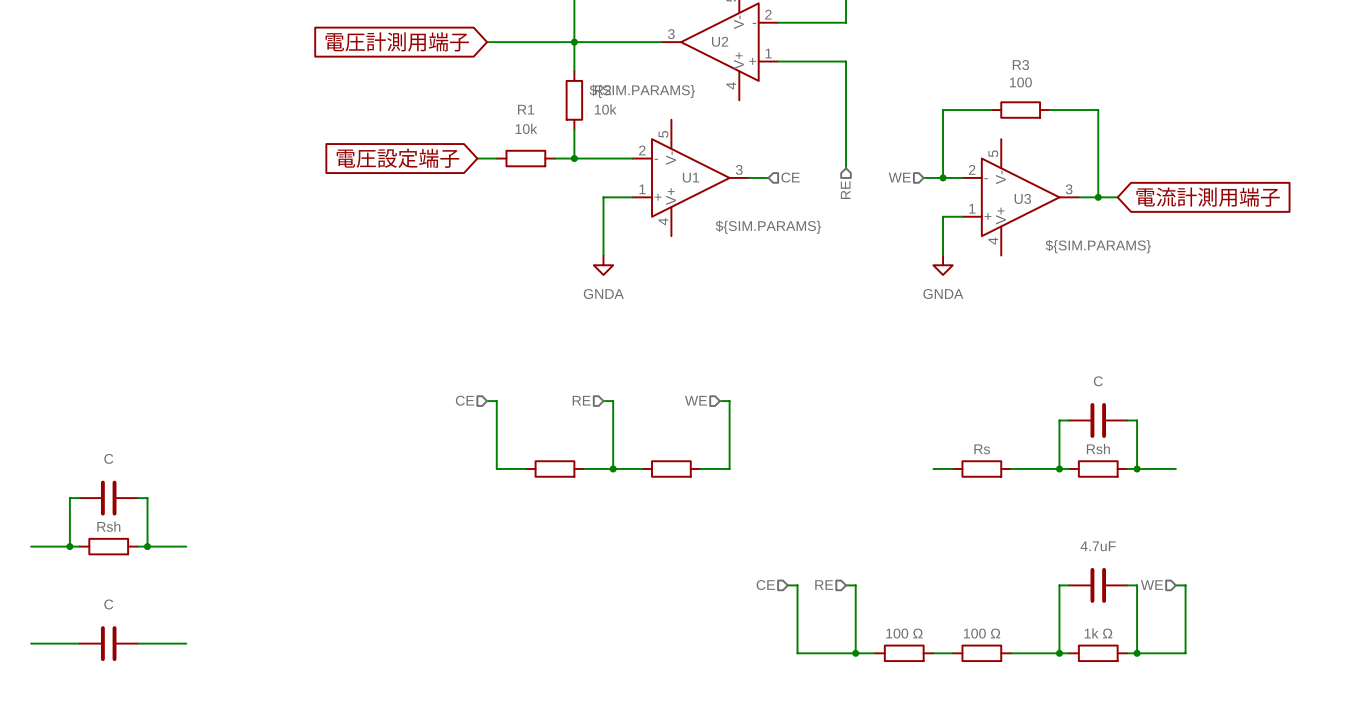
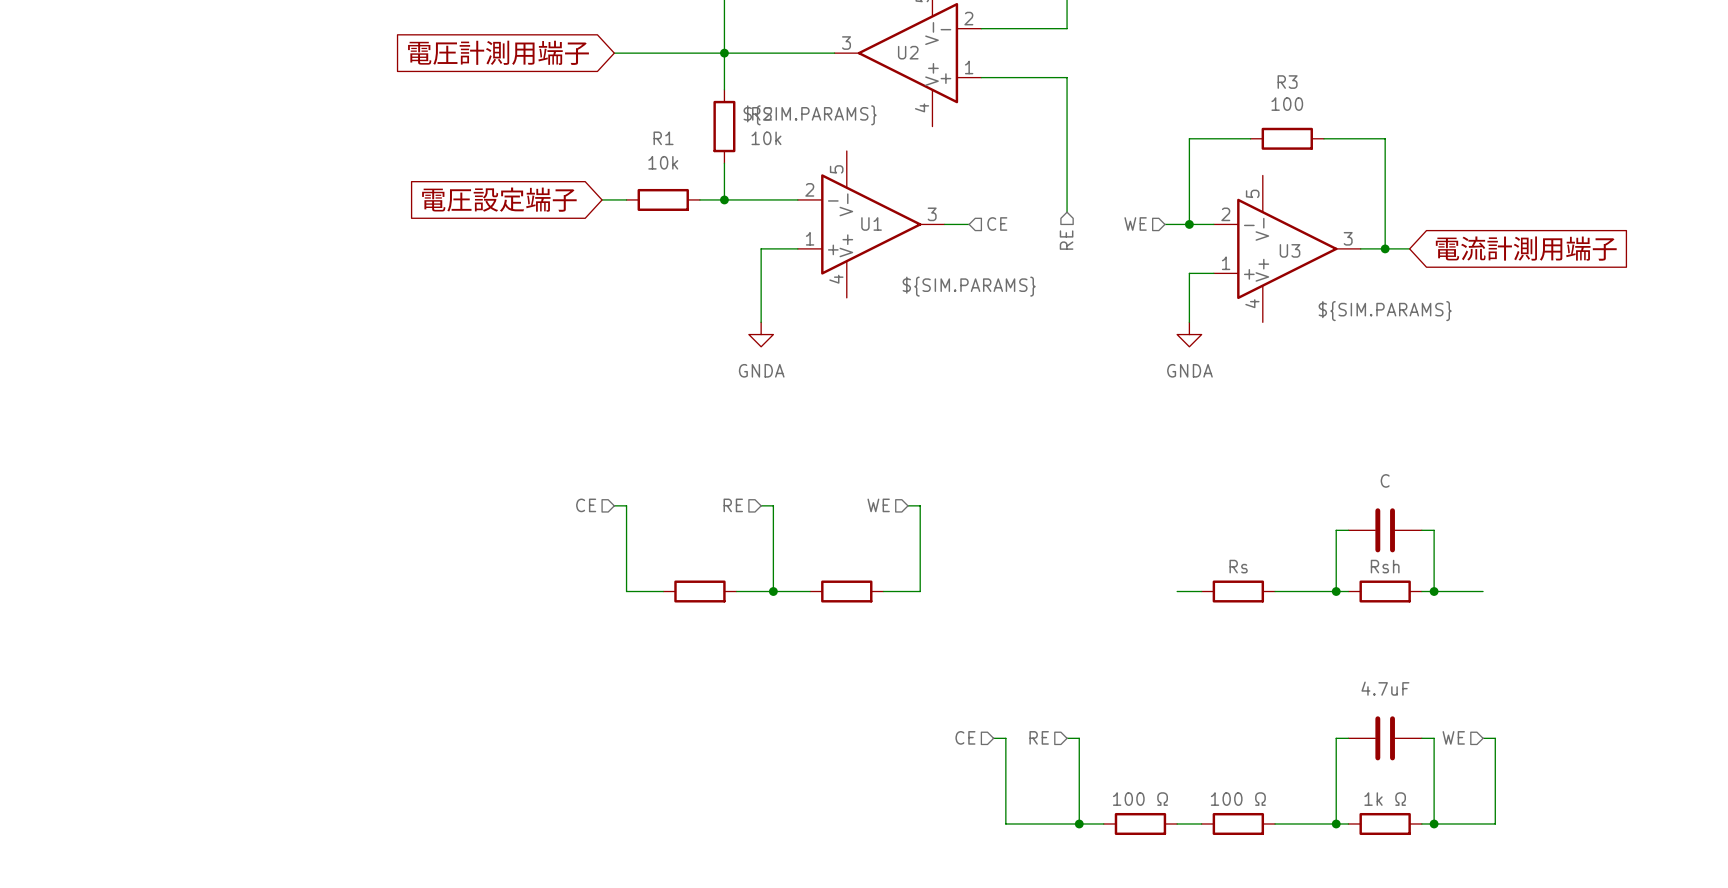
wire: (79, 498) (69, 498) (69, 546) -> none
part: C (108, 498) -> none
wire: (137, 498) (147, 498) (147, 546) -> none
wire: (31, 546) (79, 546) -> none
junction: (69, 546) -> none
part: Rsh (108, 546) -> none
wire: (137, 546) (186, 546) -> none
junction: (147, 546) -> none
wire: (31, 643) (79, 643) -> none
part: C (108, 643) -> none
wire: (137, 643) (186, 643) -> none

